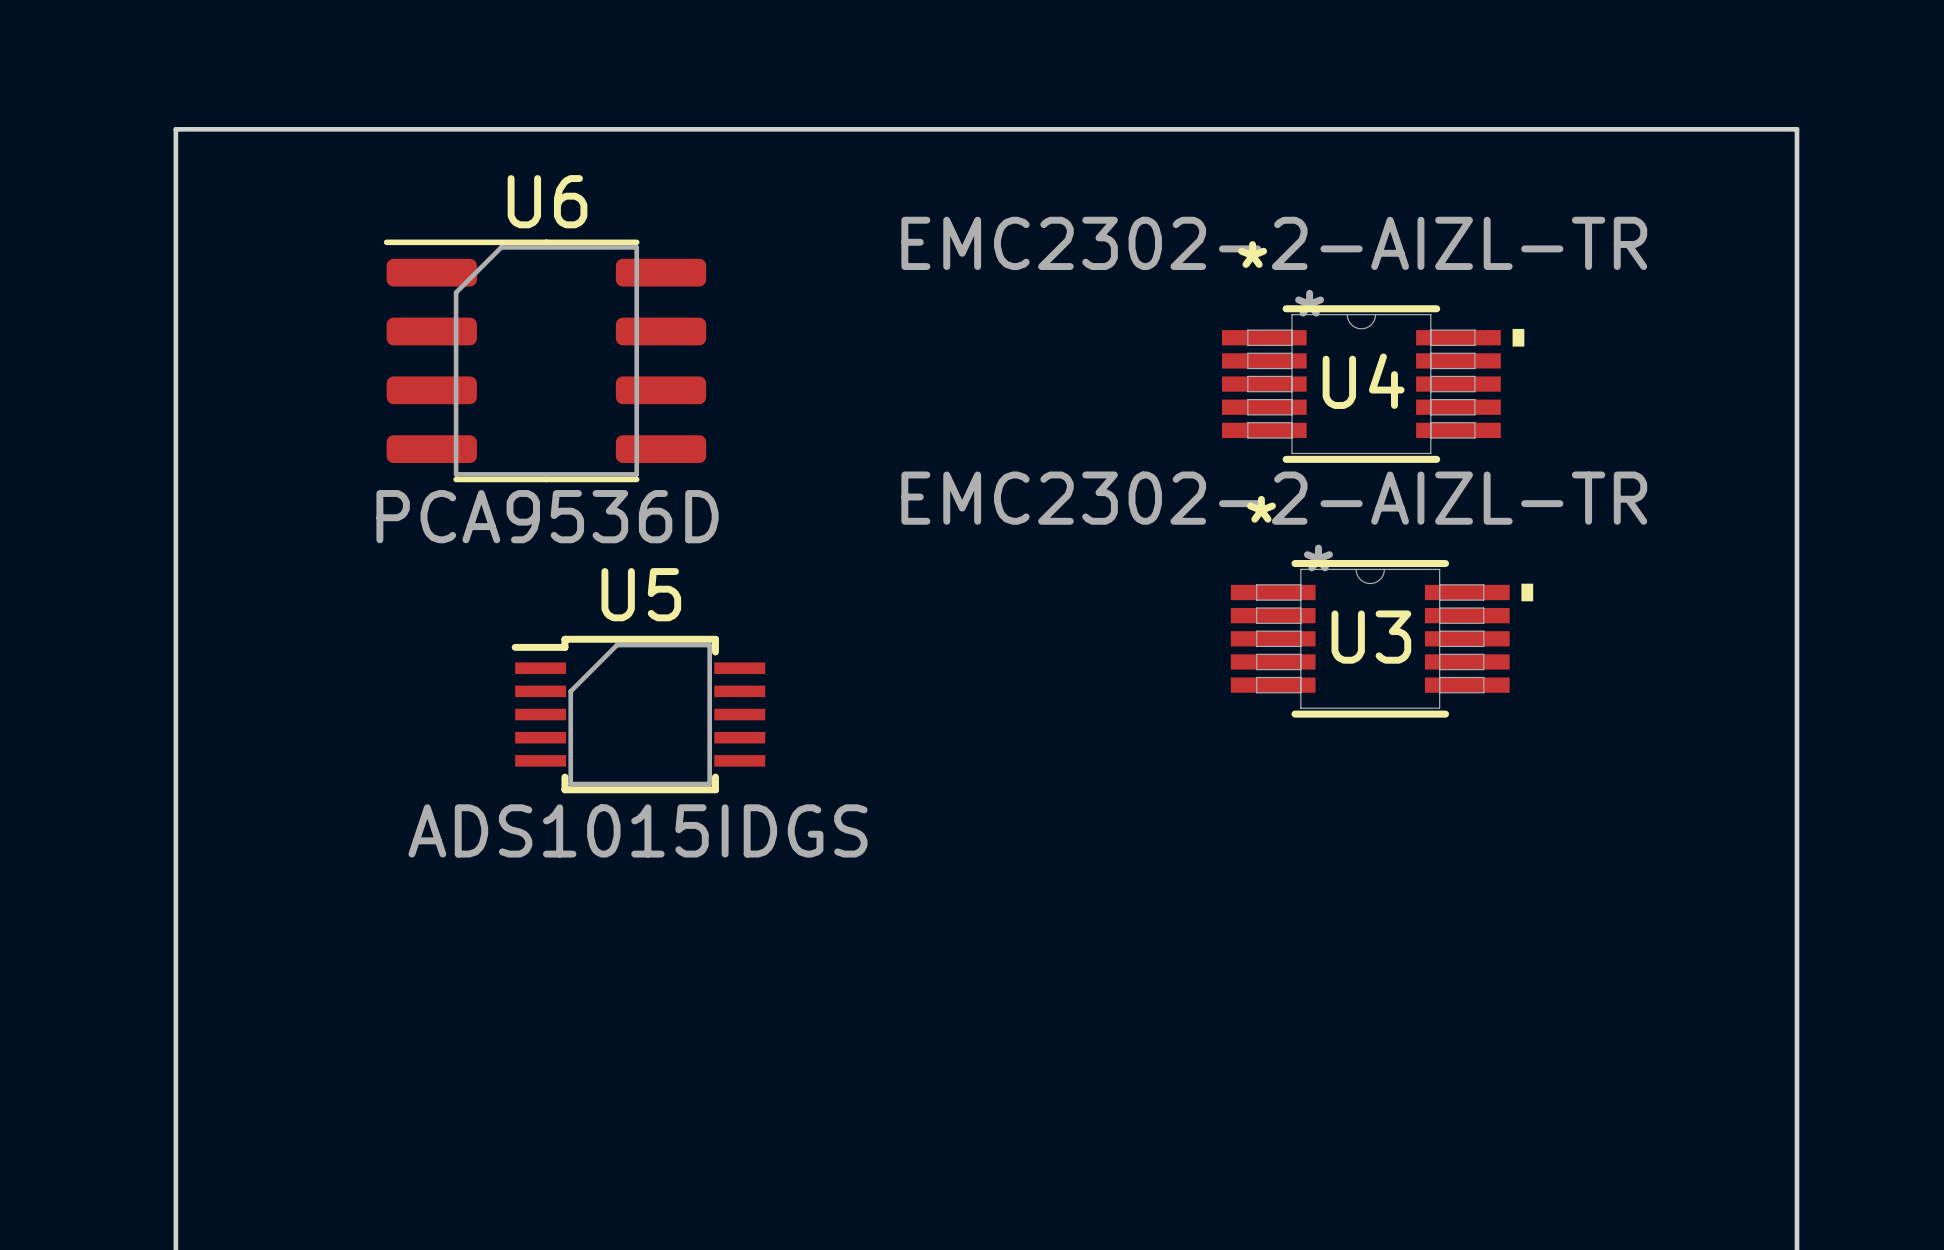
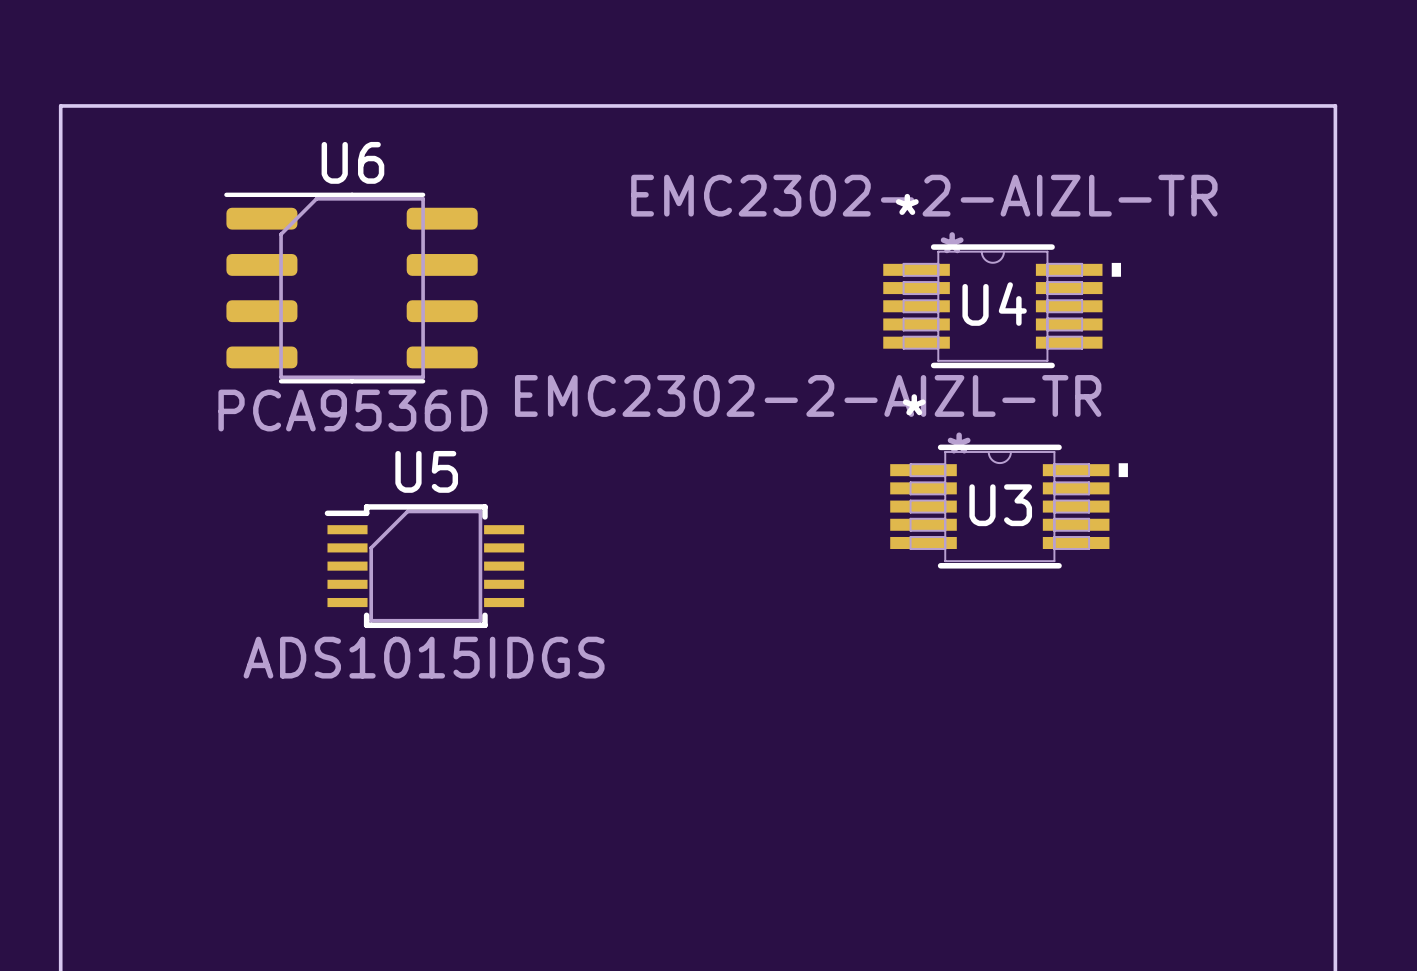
U3 value position: EMC2302-2-AIZL-TR (1274, 498) -> EMC2302-2-AIZL-TR (808, 395)

